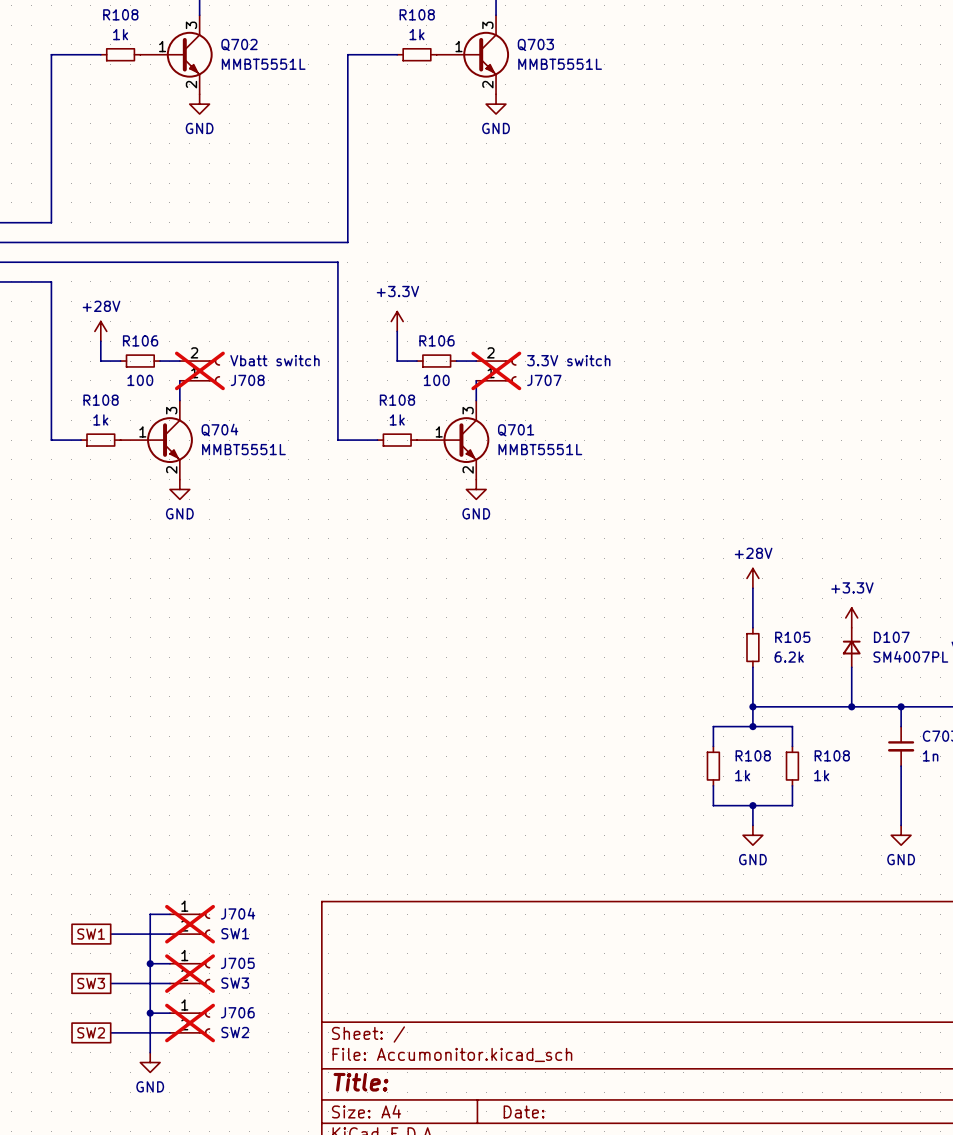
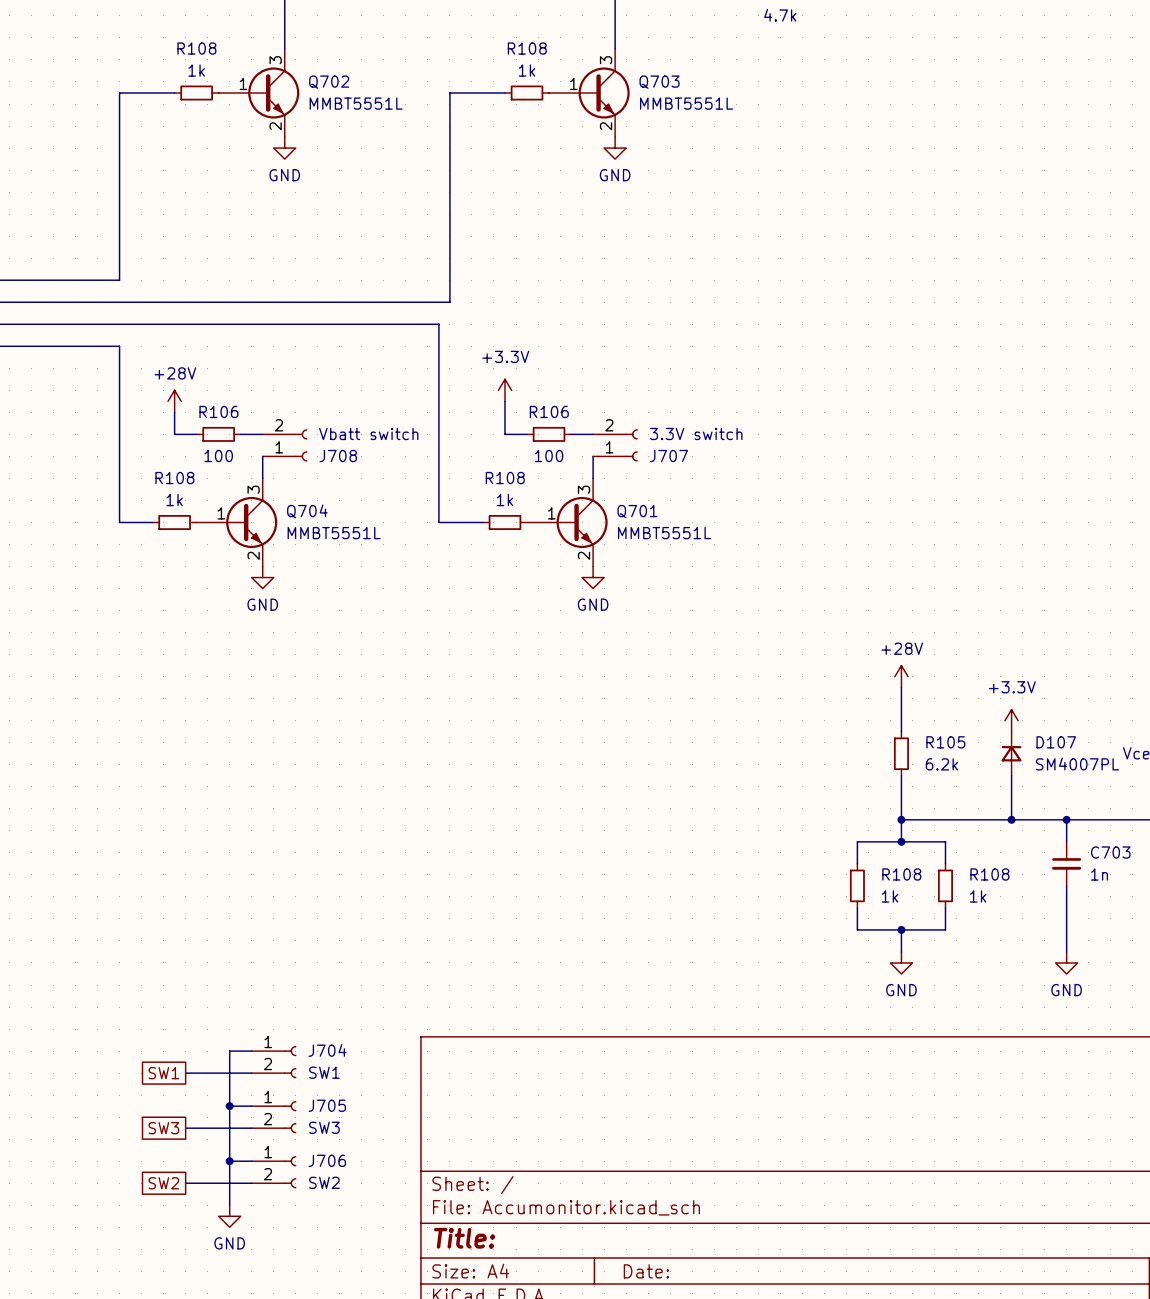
J708 do-not-place cross: (199, 370) -> none
J707 do-not-place cross: (496, 370) -> none
J704 do-not-place cross: (190, 924) -> none
J705 do-not-place cross: (190, 973) -> none
J706 do-not-place cross: (190, 1023) -> none

